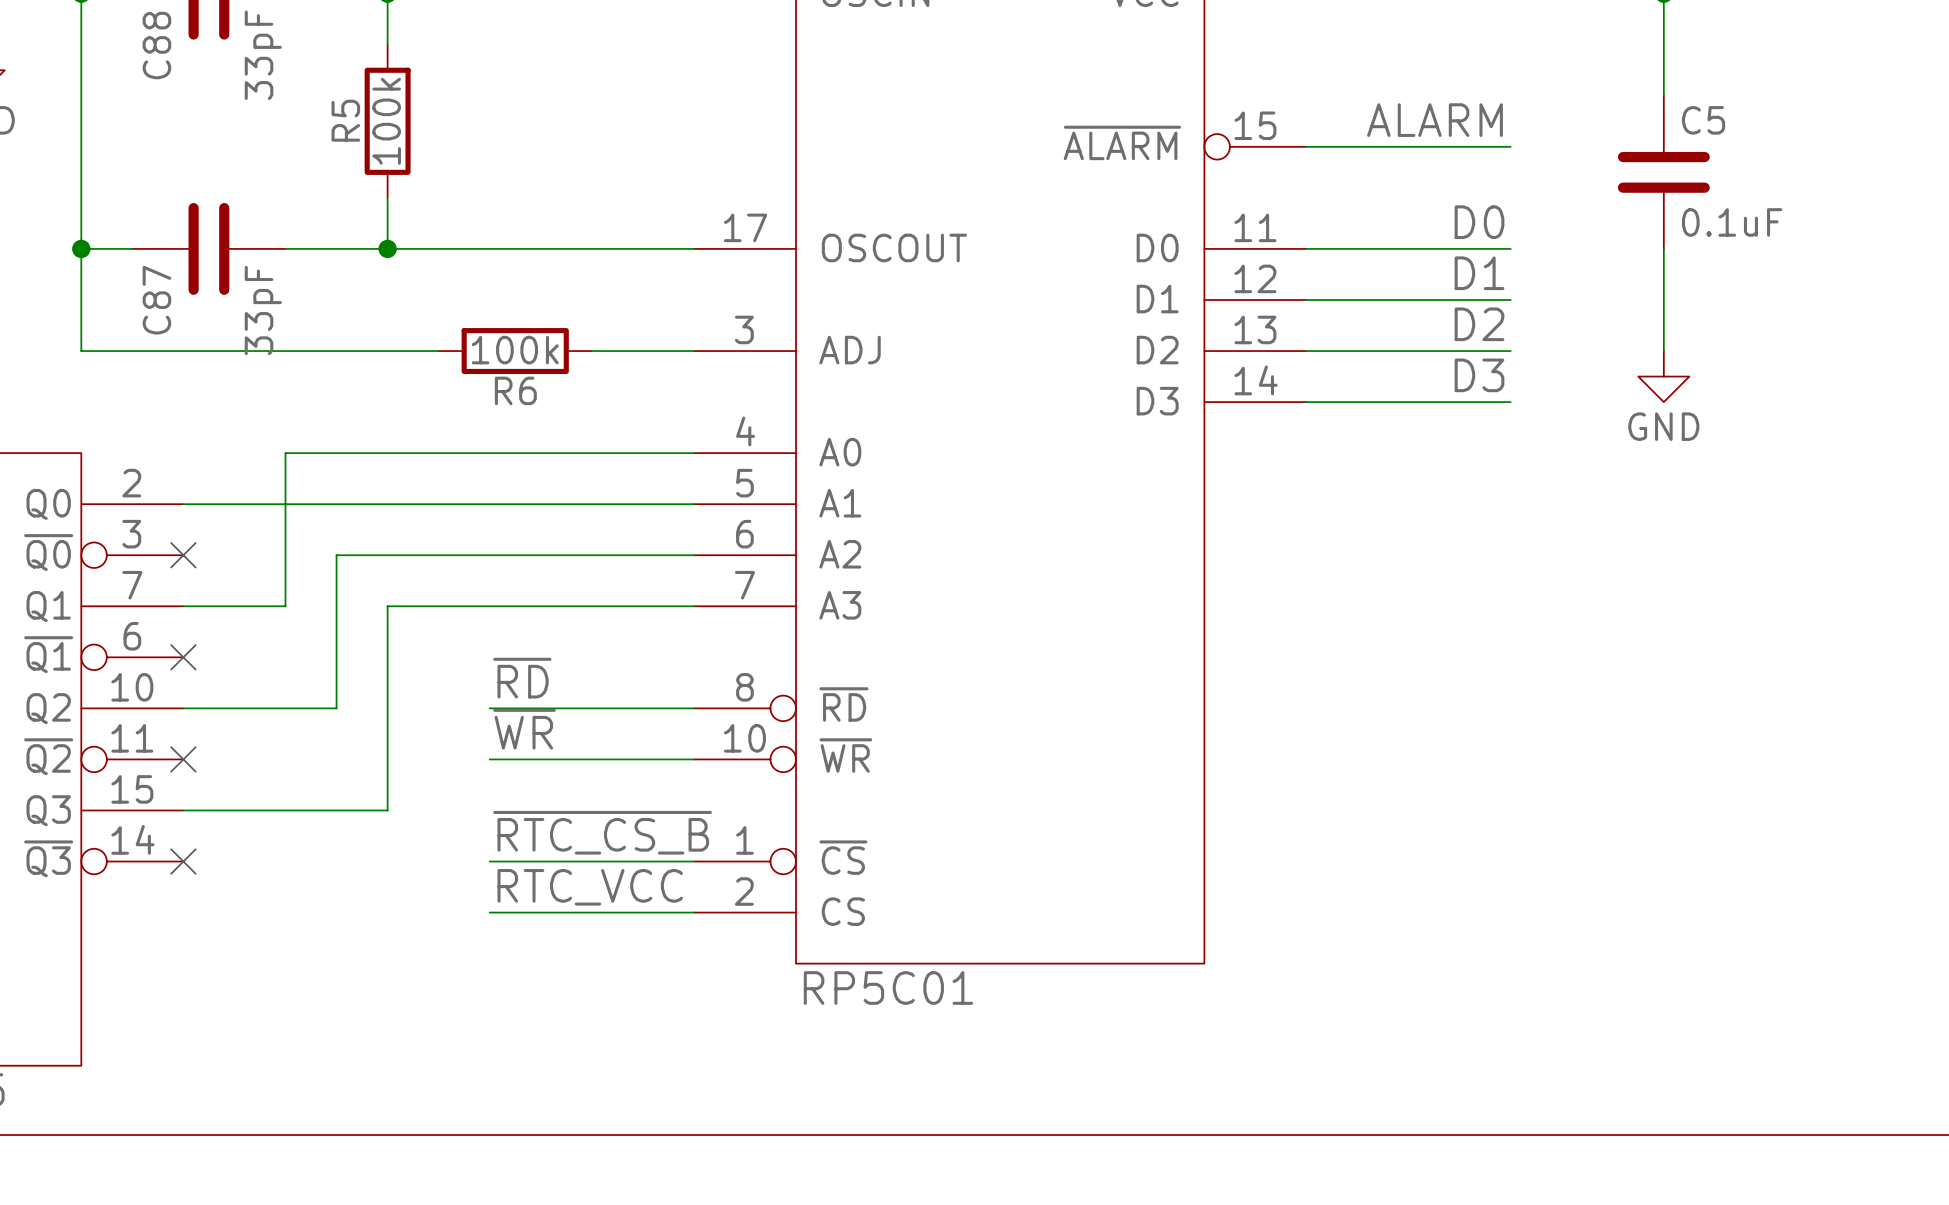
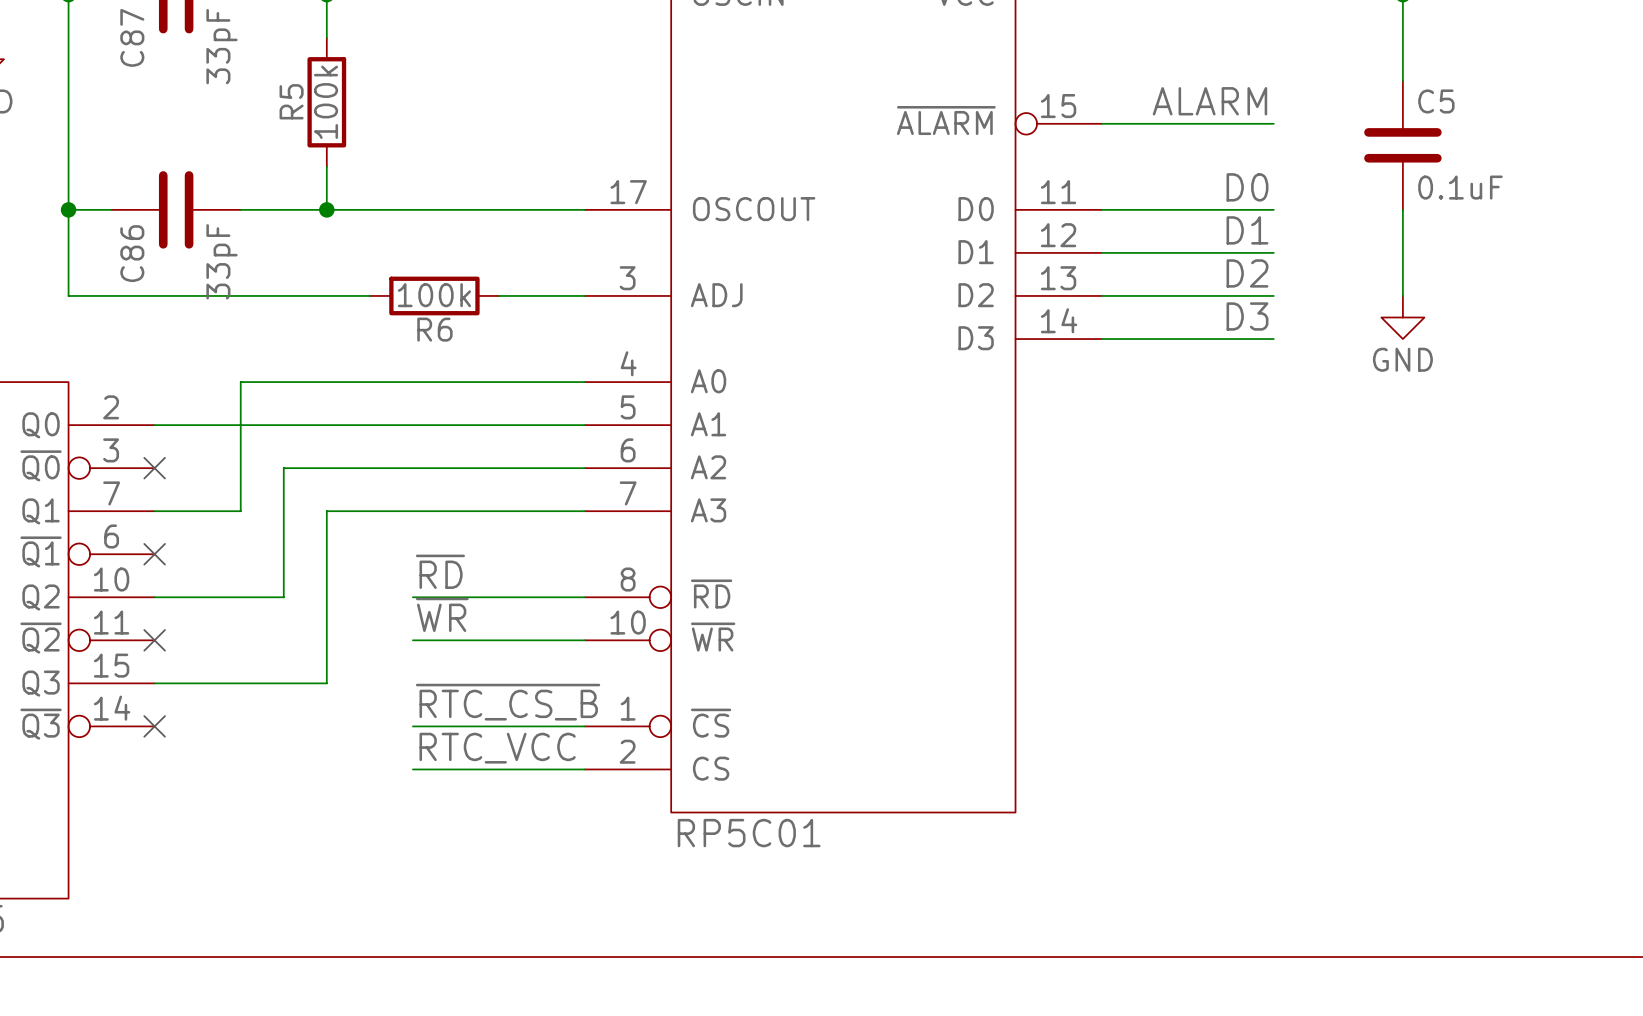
C88 name: C88 (156, 45) -> C87 (132, 37)
C87 name: C87 (156, 300) -> C86 (132, 253)

